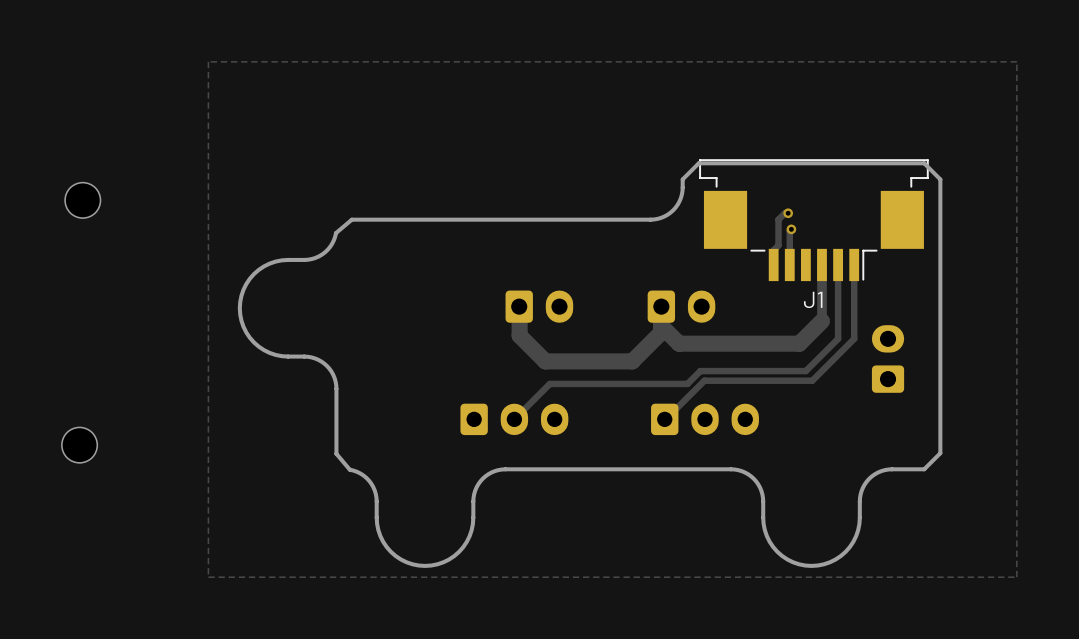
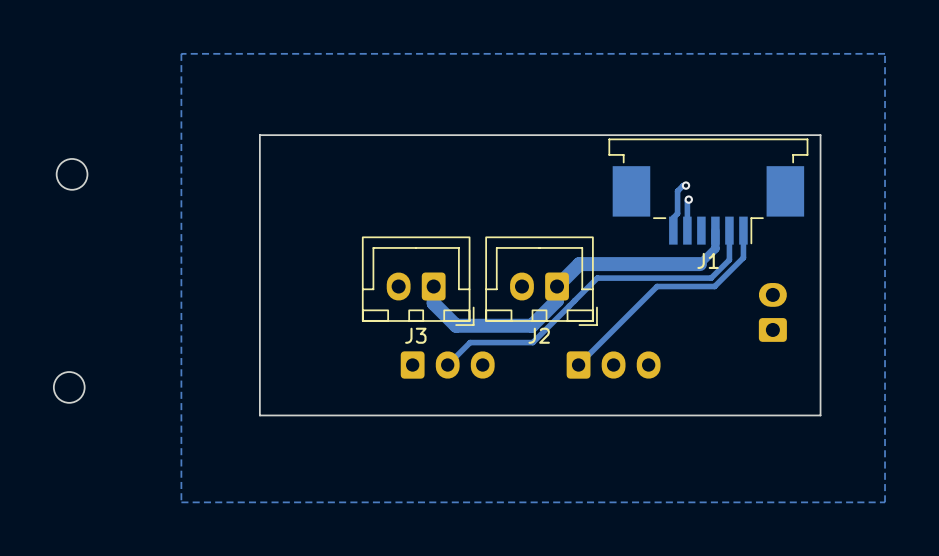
board edge: (924, 163) (940, 179) (940, 453) (924, 469) (884, 470) (869, 478) (860, 494) (859, 523) (853, 541) (840, 555) (824, 564) (811, 565) (799, 564) (787, 559) (777, 551) (769, 541) (764, 530) (763, 497) (758, 484) (748, 474) (731, 469) (498, 470) (485, 476) (476, 487) (473, 497) (471, 530) (466, 541) (459, 551) (443, 562) (431, 565) (418, 565) (406, 562) (390, 551) (380, 536) (377, 523) (376, 497) (371, 483) (360, 473) (349, 469) (336, 453) (336, 385) (331, 371) (324, 363) (314, 358) (281, 356) (263, 350) (249, 337) (241, 320) (239, 308) (241, 295) (246, 284) (253, 274) (263, 266) (275, 261) (307, 259) (318, 256) (330, 246) (335, 233) (351, 219) (654, 219) (664, 216) (675, 207) (681, 194) (682, 179) (698, 163) (924, 163) -> (820, 135) (820, 415) (259, 415) (259, 135) (820, 135)
track: (821, 285) (821, 321) (799, 343) (679, 343) (661, 325) -> (715, 248) (700, 264) (579, 264) (557, 286) (557, 300) (531, 325) (456, 325) (433, 303) (433, 286)
track: (854, 296) (854, 338) (812, 380) (704, 380) (664, 419) -> (743, 257) (714, 286) (657, 286) (578, 365)
track: (838, 298) (838, 338) (805, 371) (700, 371) (687, 383) (549, 383) (540, 393) -> (729, 259) (711, 278) (597, 278) (532, 342) (470, 342)
J3 side: top (539, 306) -> bottom (418, 281)
track: (661, 306) (661, 332) (632, 361) (545, 361) (519, 335) (519, 306) -> none
J2 side: top (681, 306) -> bottom (541, 281)

